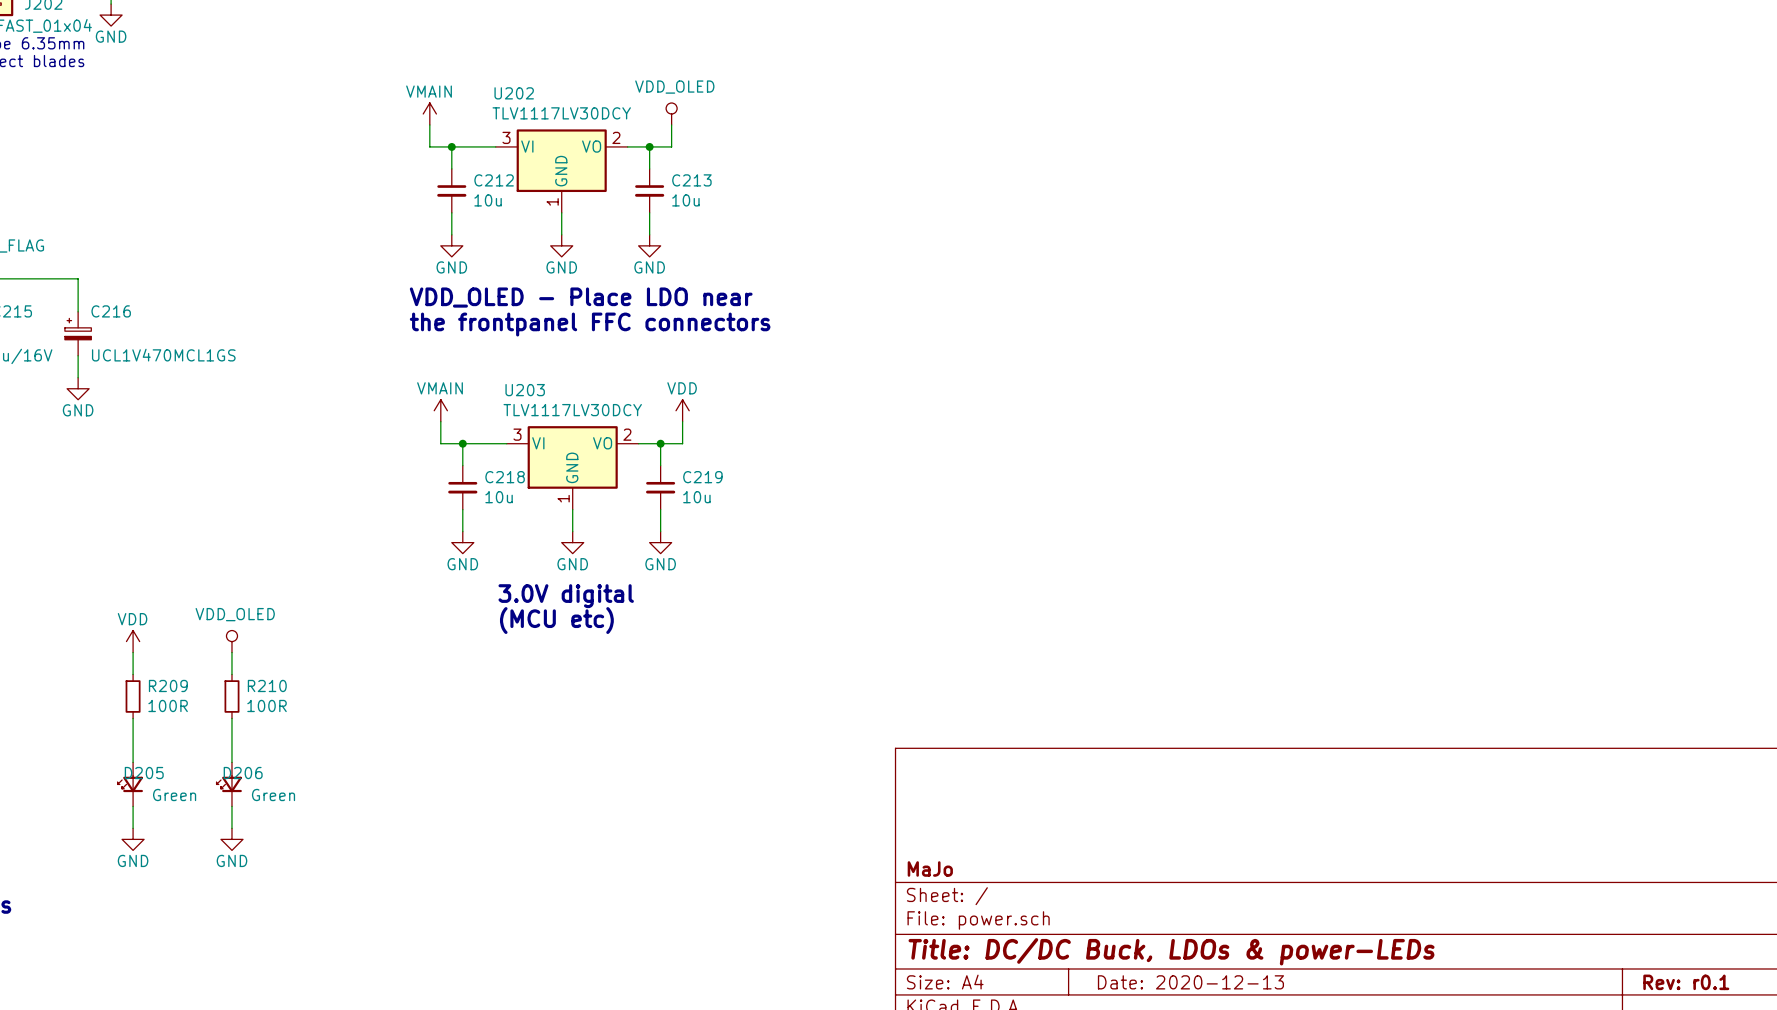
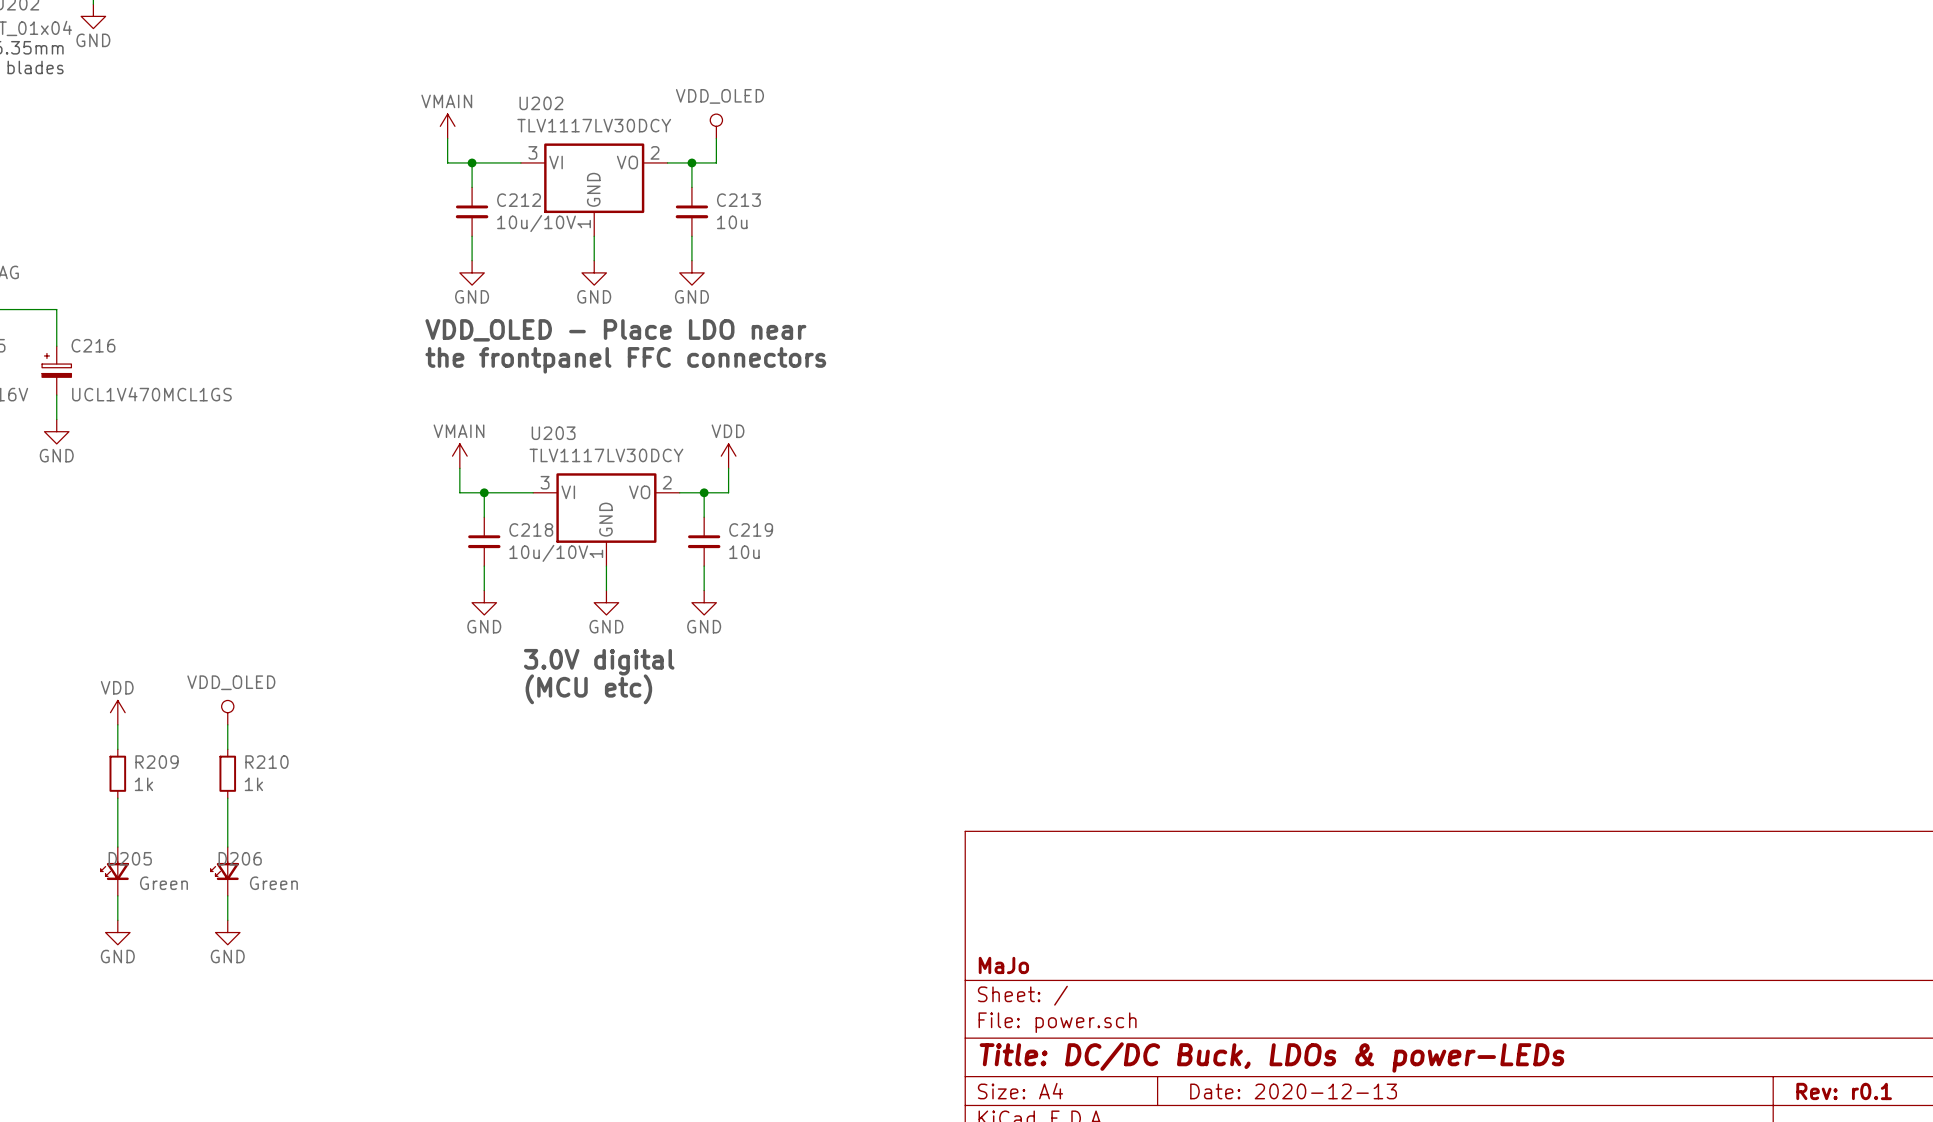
C212 value: 10u (488, 200) -> 10u/10V (536, 223)
C218 value: 10u (499, 497) -> 10u/10V (548, 553)
R209 value: 100R (168, 705) -> 1k (143, 784)
R210 value: 100R (267, 705) -> 1k (253, 784)

